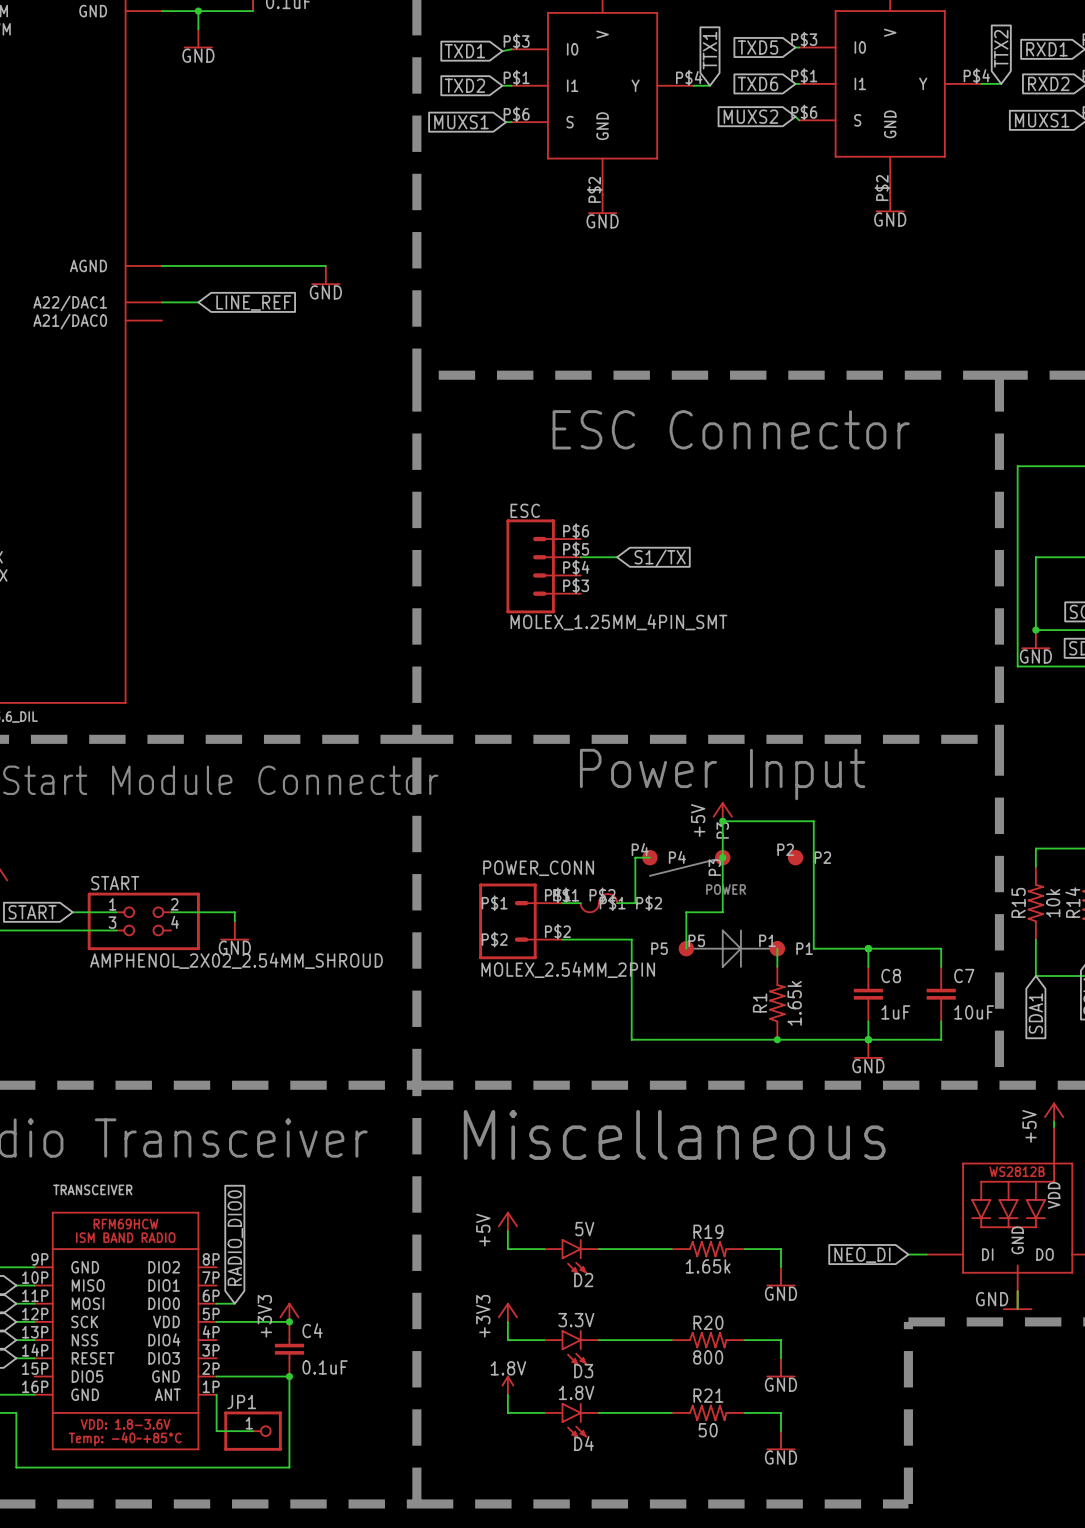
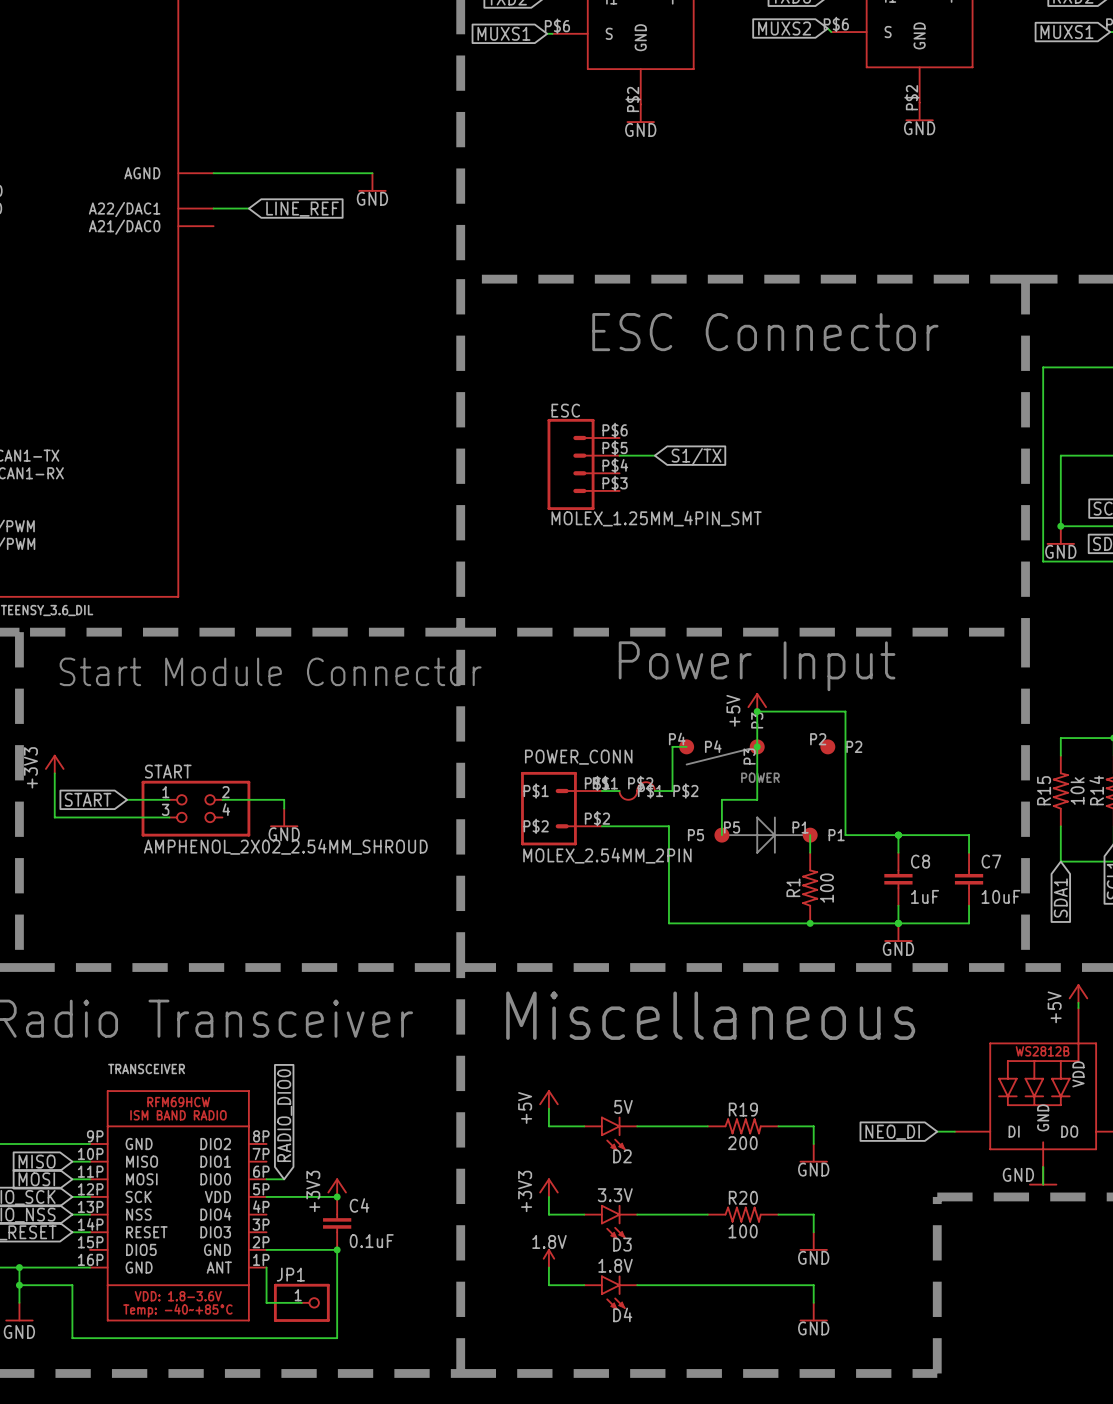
R1 value: 1.65k (794, 1003) -> 100 (826, 888)
R19 value: 1.65k (708, 1266) -> 200 (742, 1143)
R20 value: 800 (708, 1357) -> 100 (743, 1231)
R21: 50 (708, 1412) -> none

